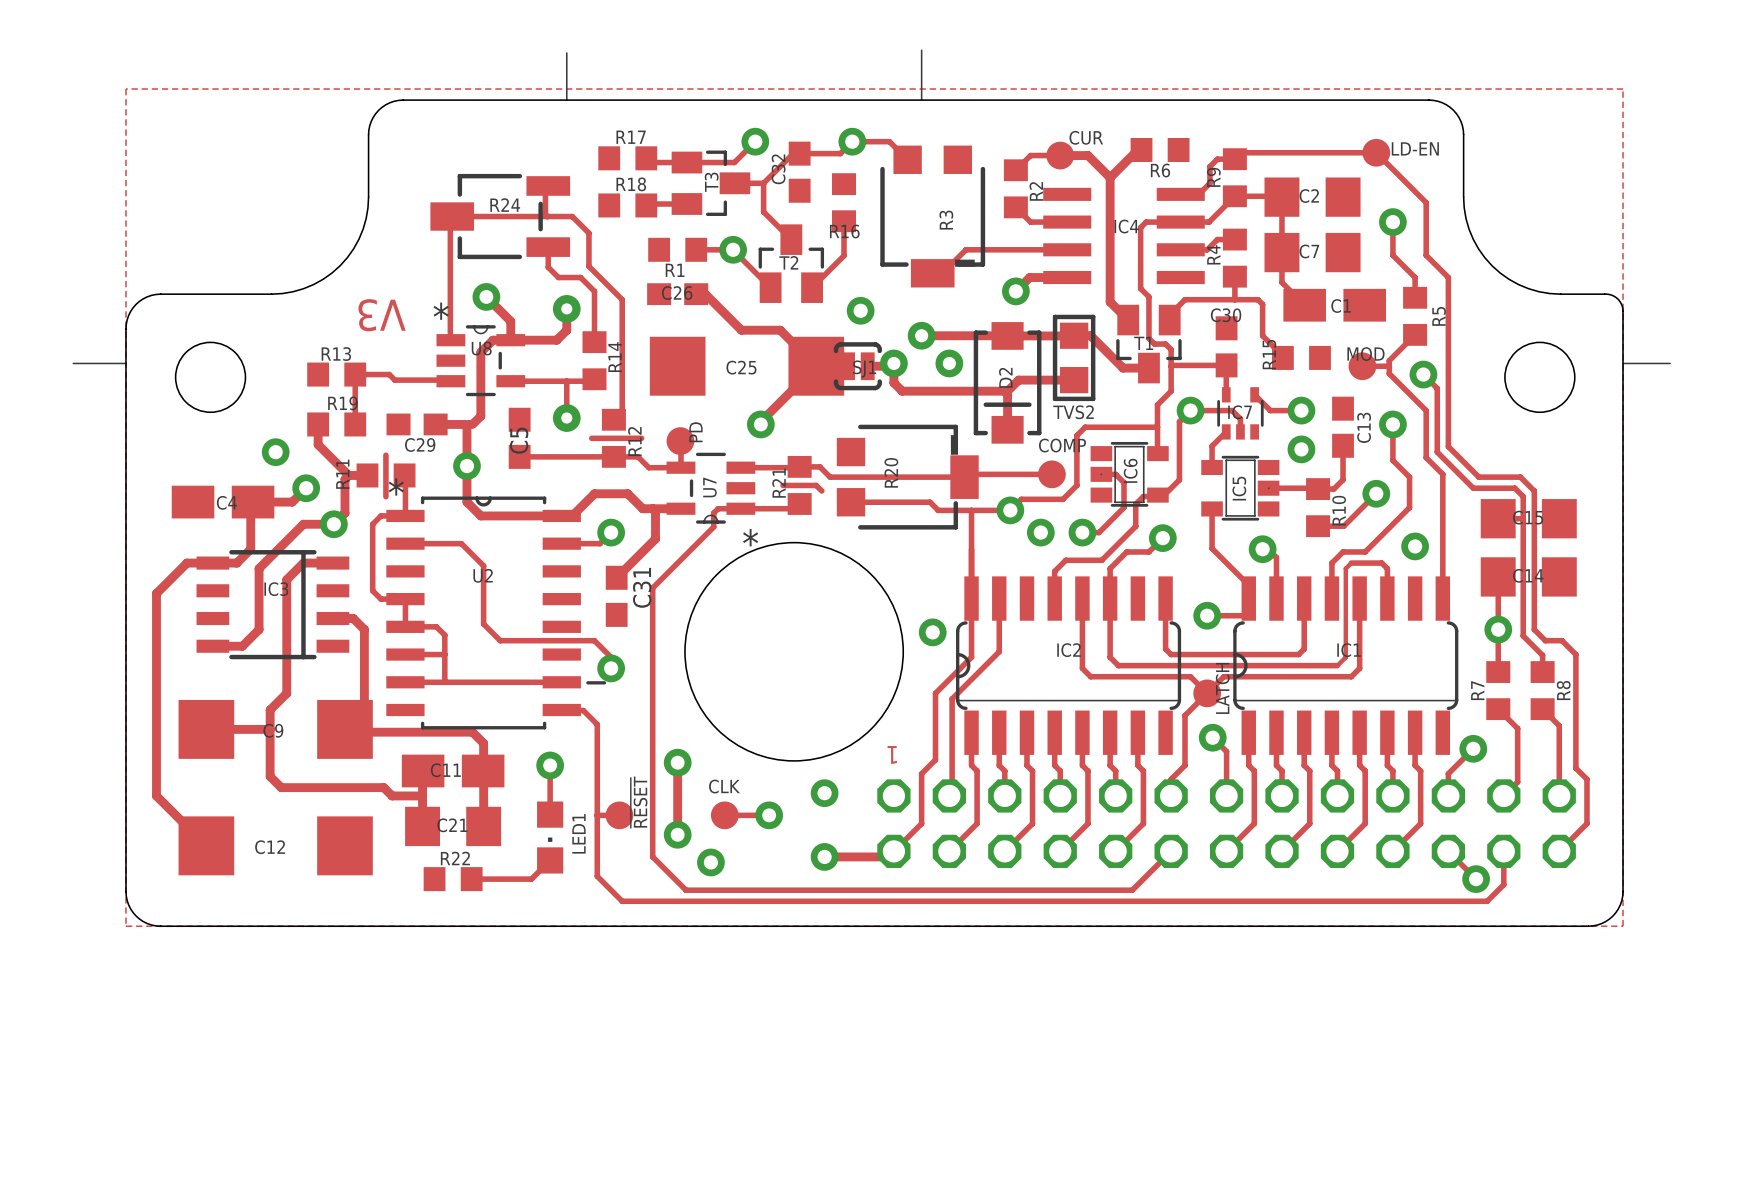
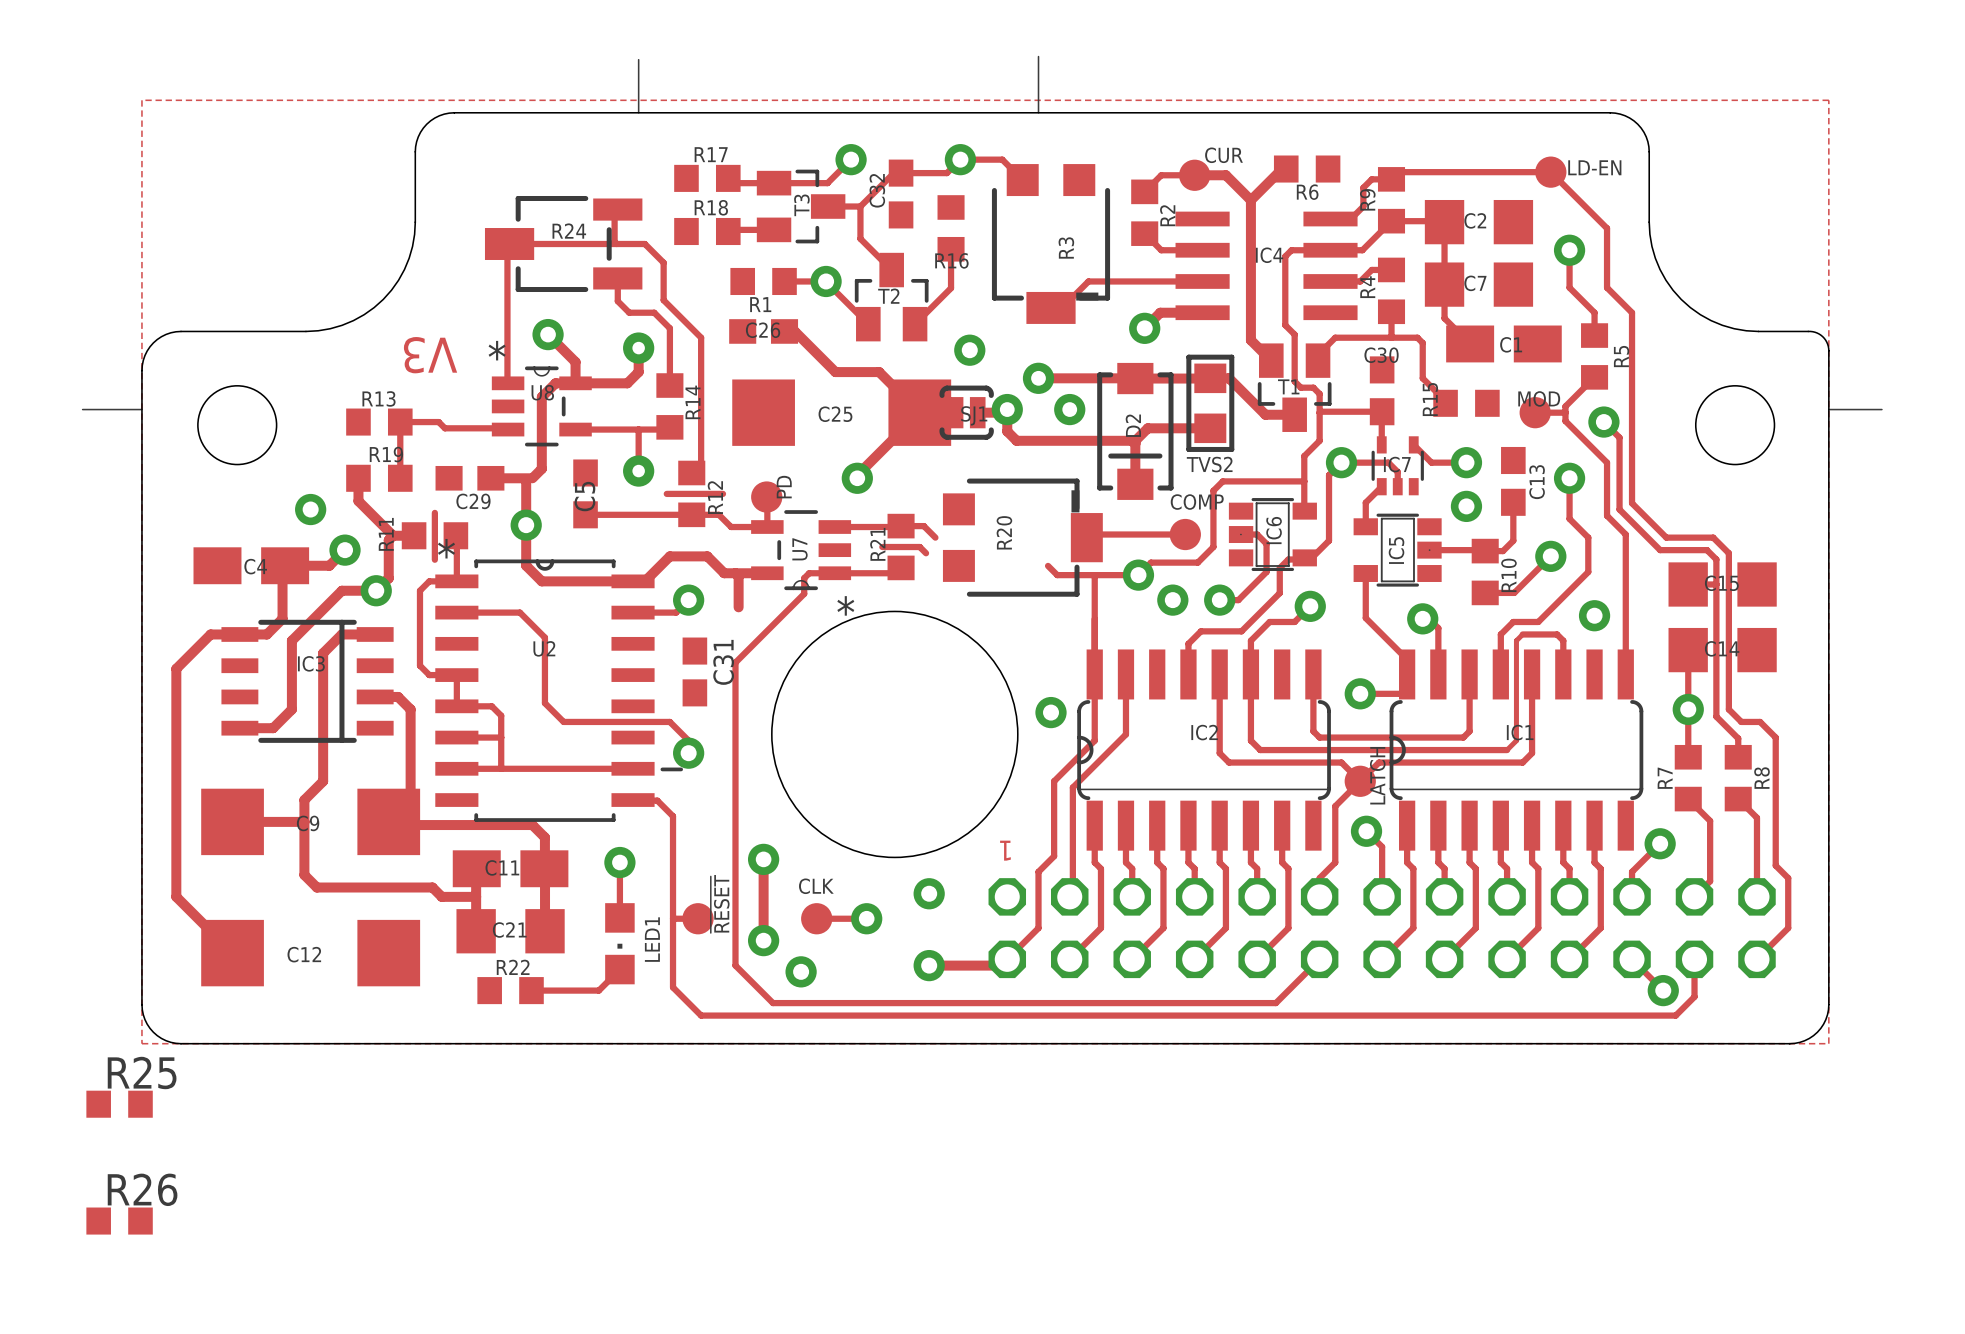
track: (967, 474) (964, 477) (830, 477) -> none
track: (851, 502) (930, 502) -> none
track: (655, 538) (616, 577) -> none
R25: none -> (119, 1104)
R26: none -> (119, 1221)

